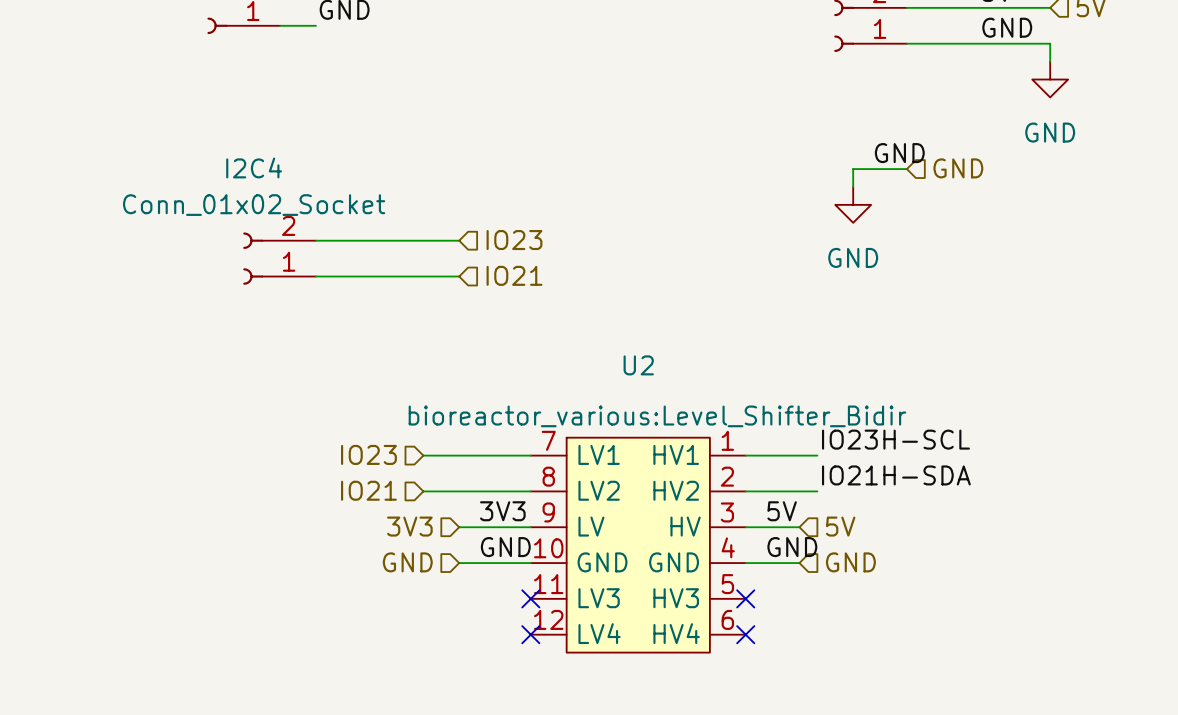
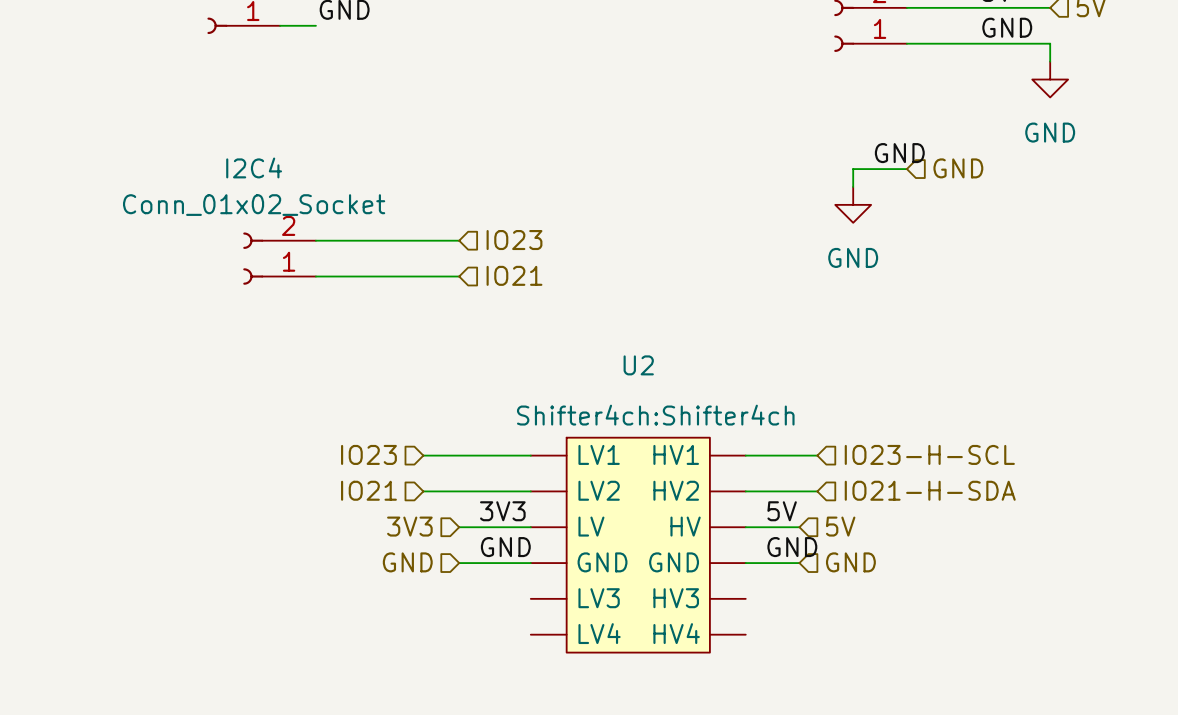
U2 text: bioreactor_various:Level_Shifter_Bidir (657, 416) -> Shifter4ch:Shifter4ch (655, 415)
U2 symbol: [530, 437, 746, 653] -> [530, 437, 746, 653]
label: IO23H-SCL (895, 439) -> none
hierarchical label: none -> IO23-H-SCL (929, 454)
label: IO21H-SDA (896, 475) -> none
hierarchical label: none -> IO21-H-SDA (930, 490)
no-connect mark: (530, 598) -> none
no-connect mark: (745, 598) -> none
no-connect mark: (530, 634) -> none
no-connect mark: (745, 634) -> none

